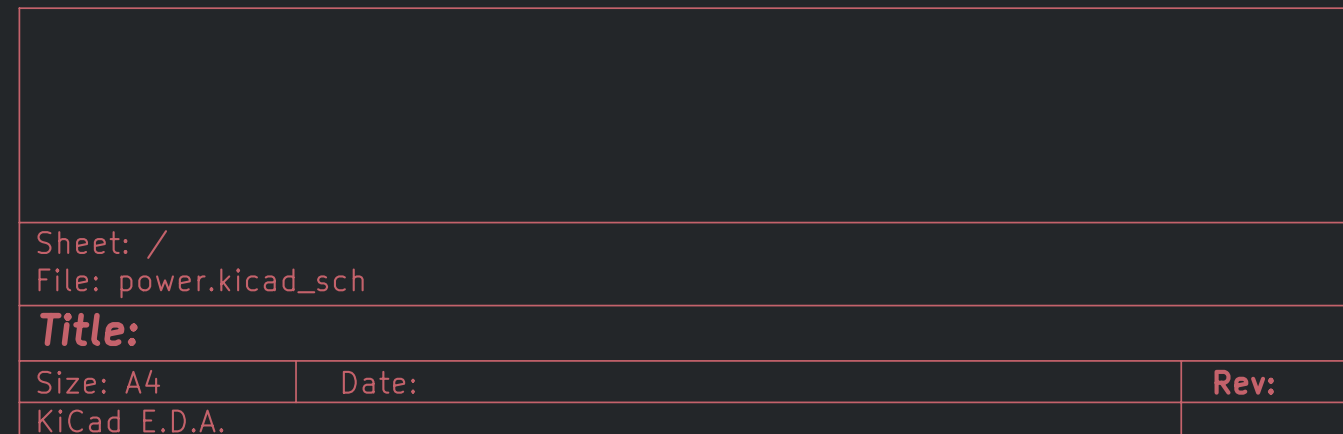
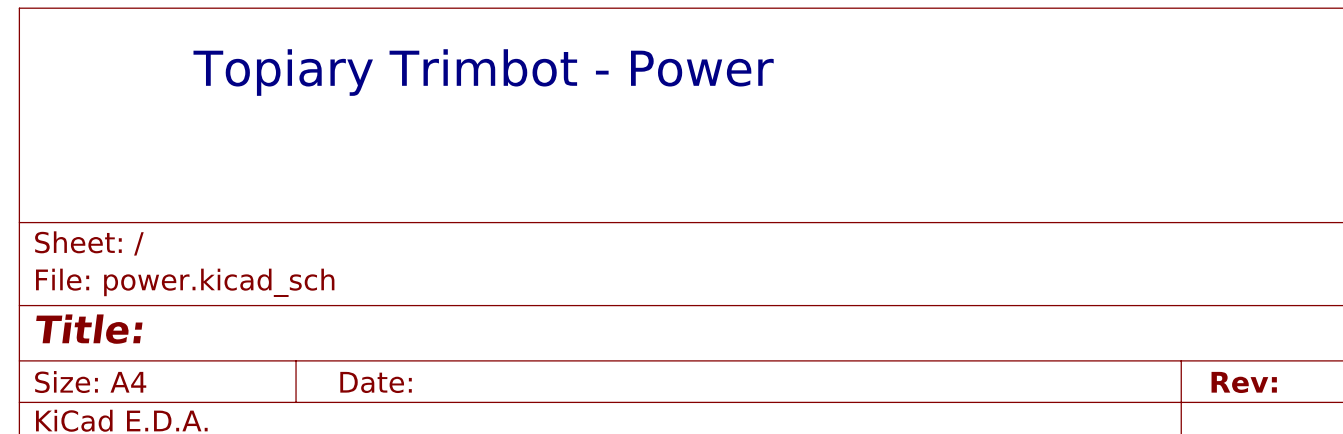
text: none -> Topiary Trimbot - Power (483, 72)

